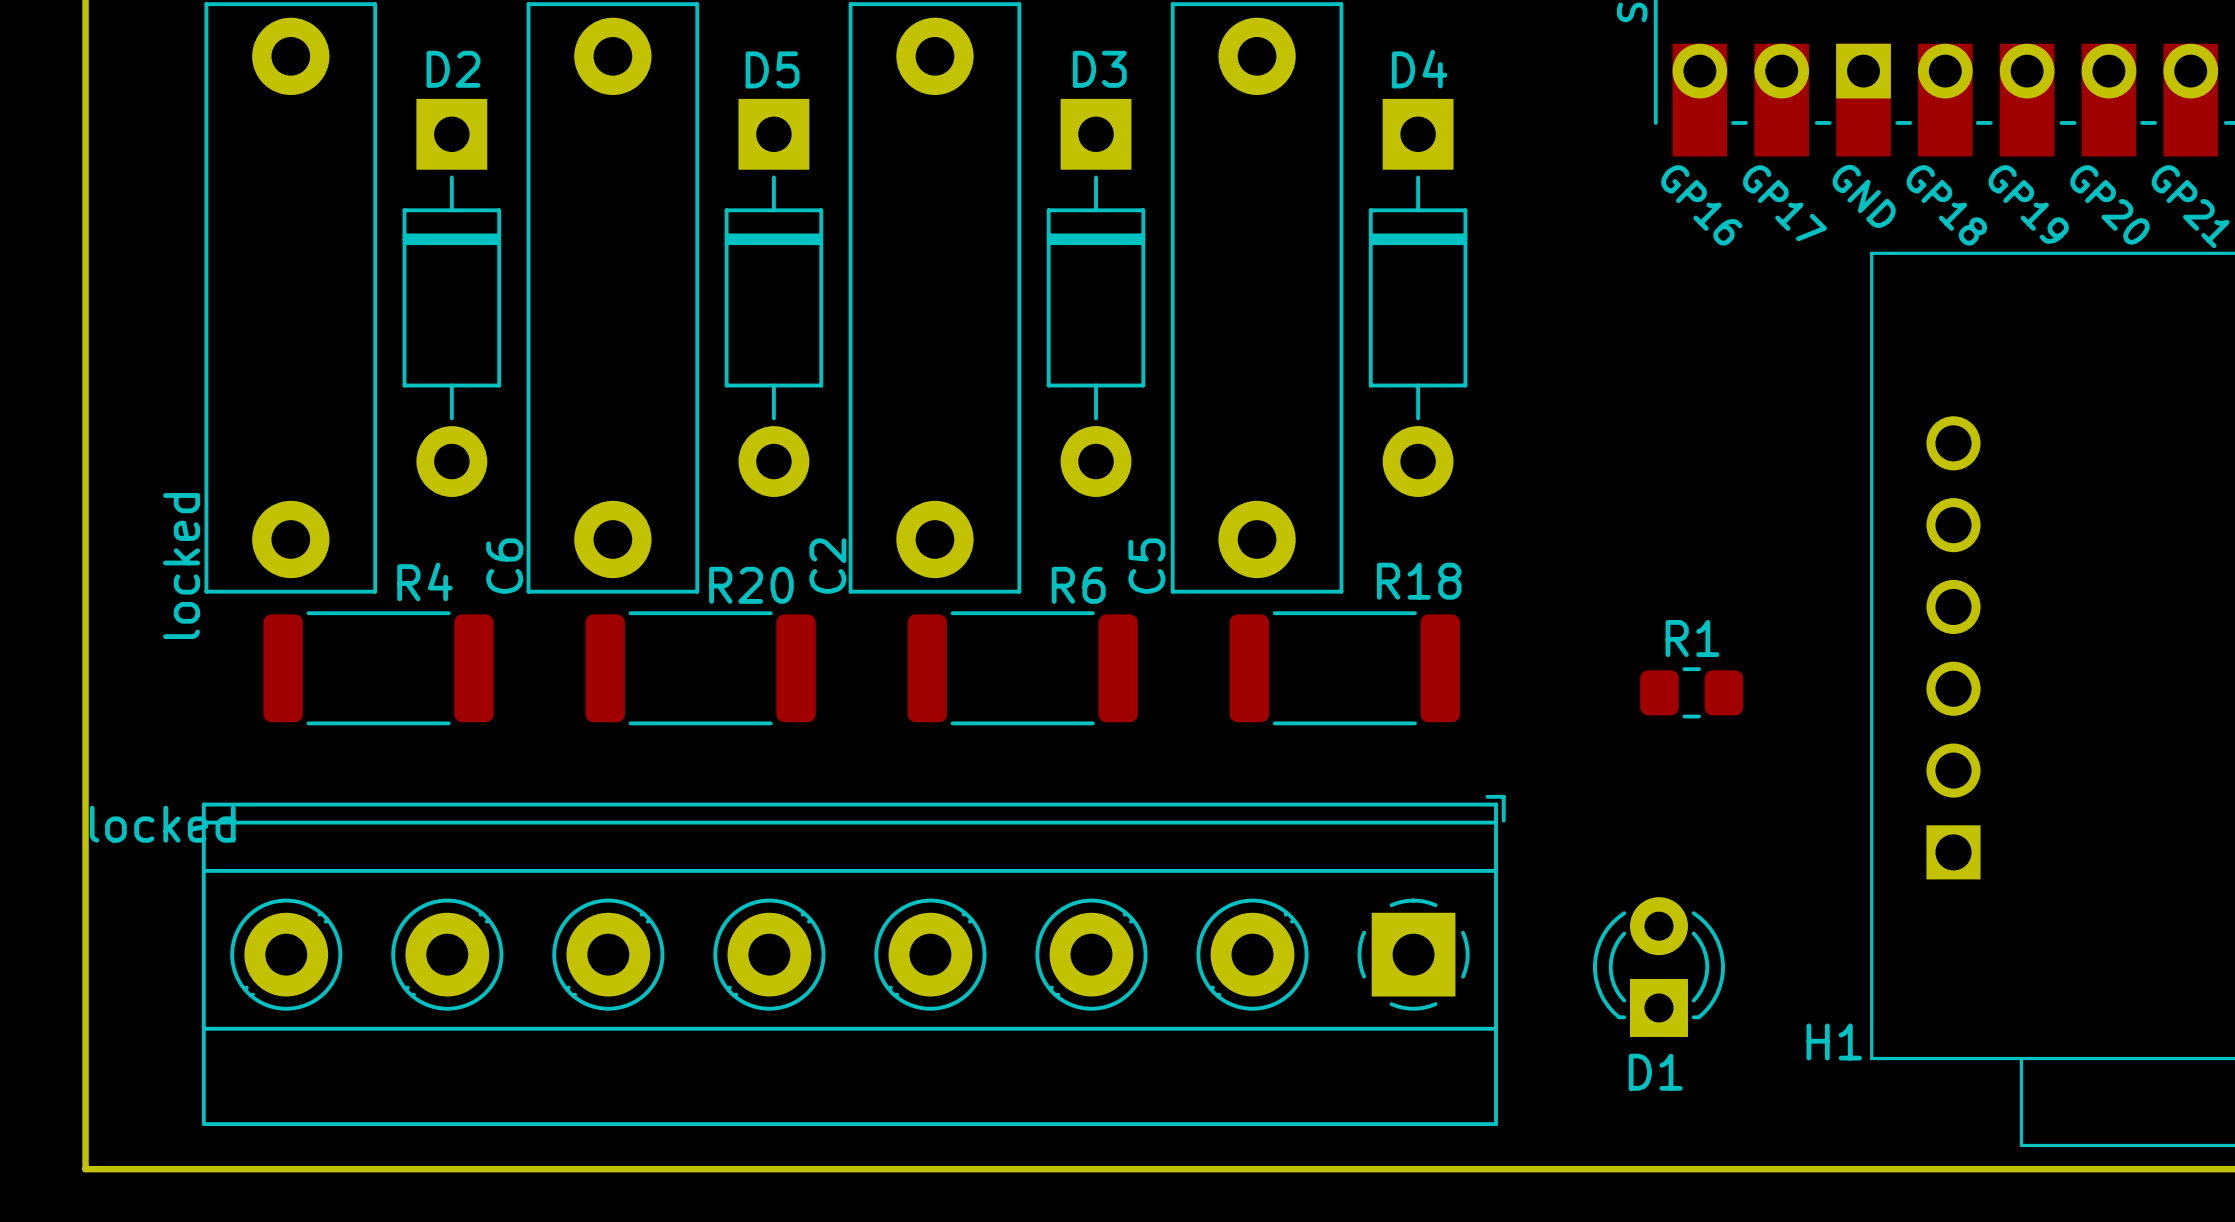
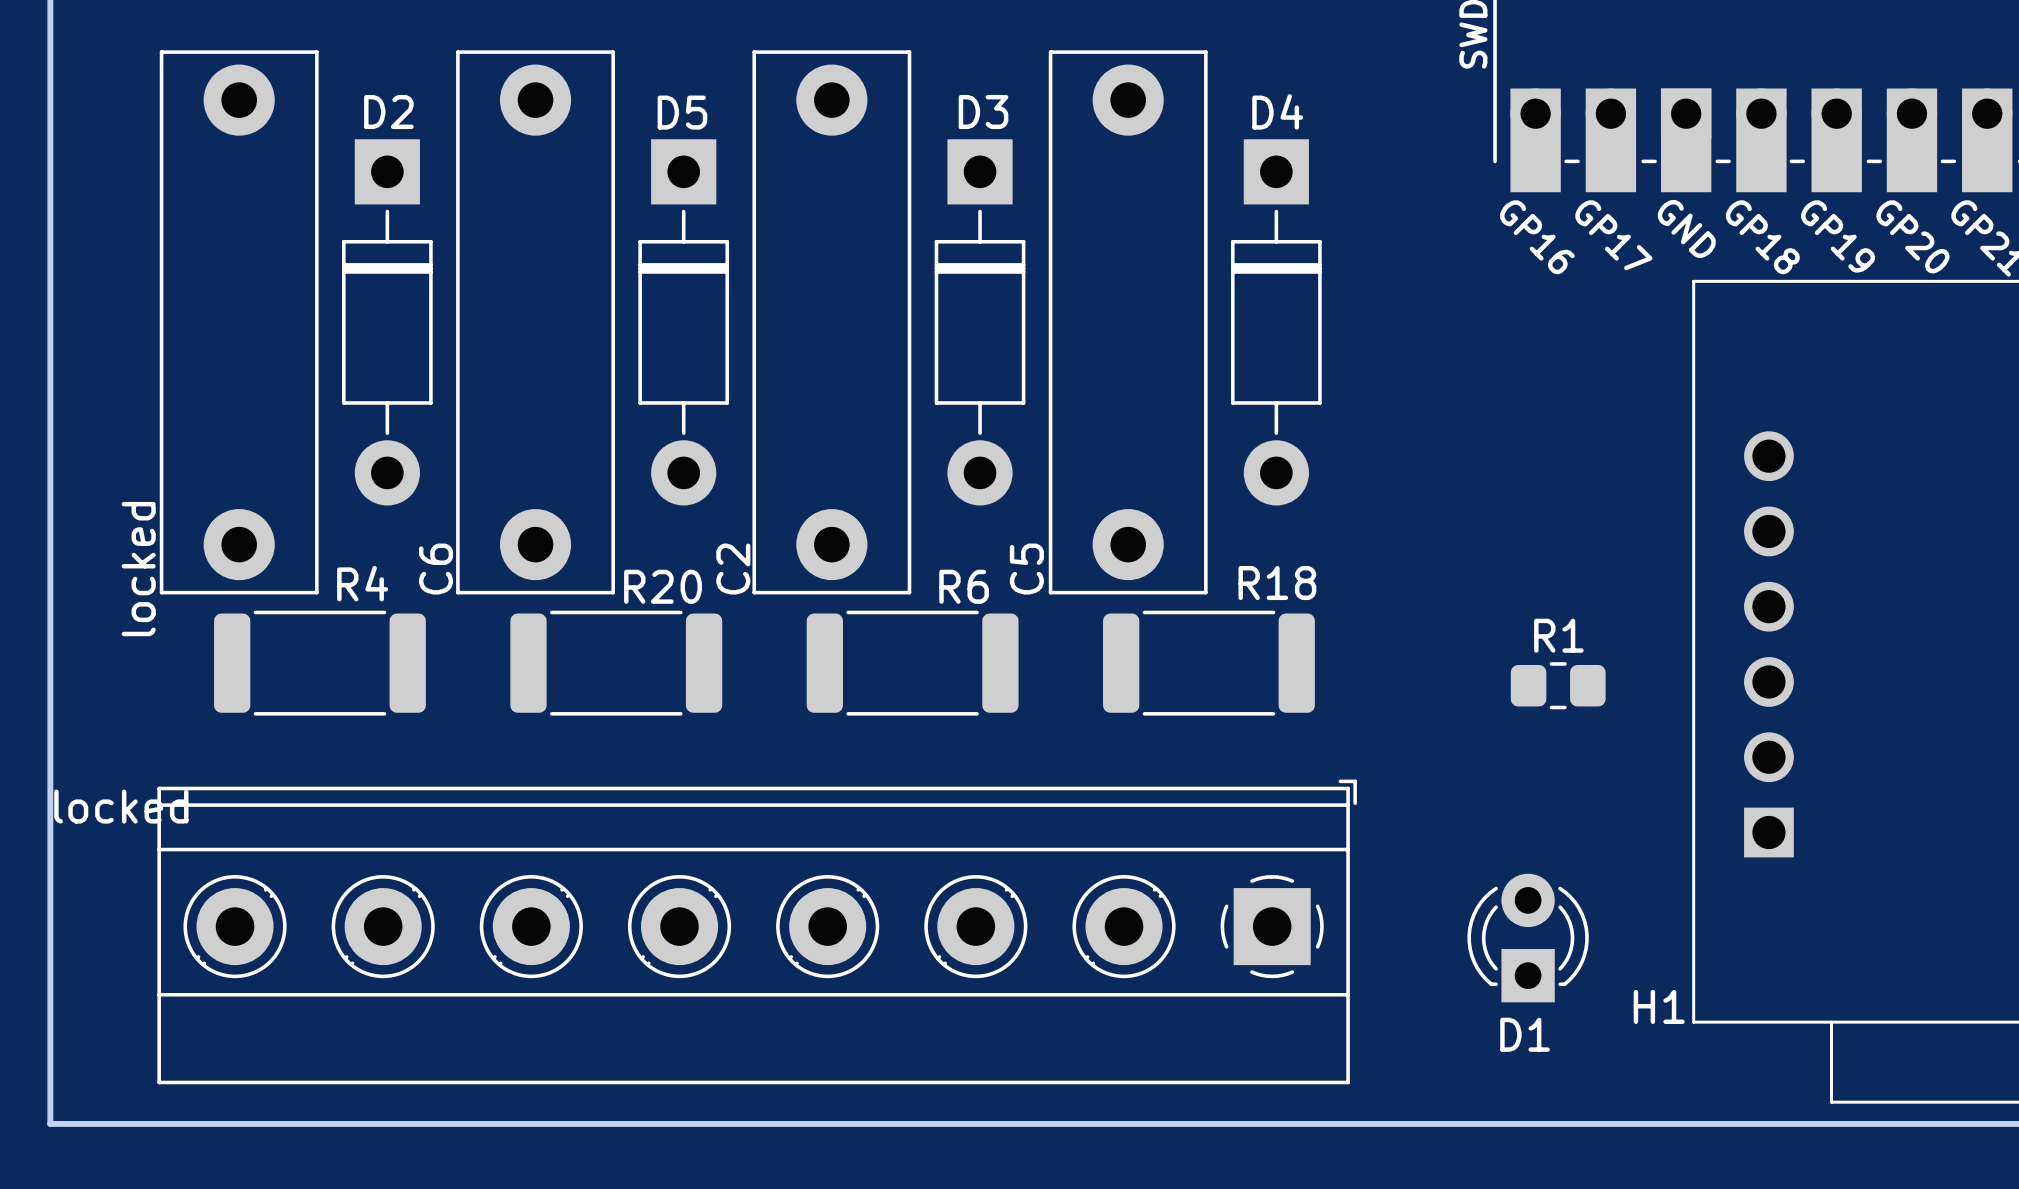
R1 position: (1691, 692) -> (1558, 685)
D1 position: (1658, 967) -> (1528, 938)

